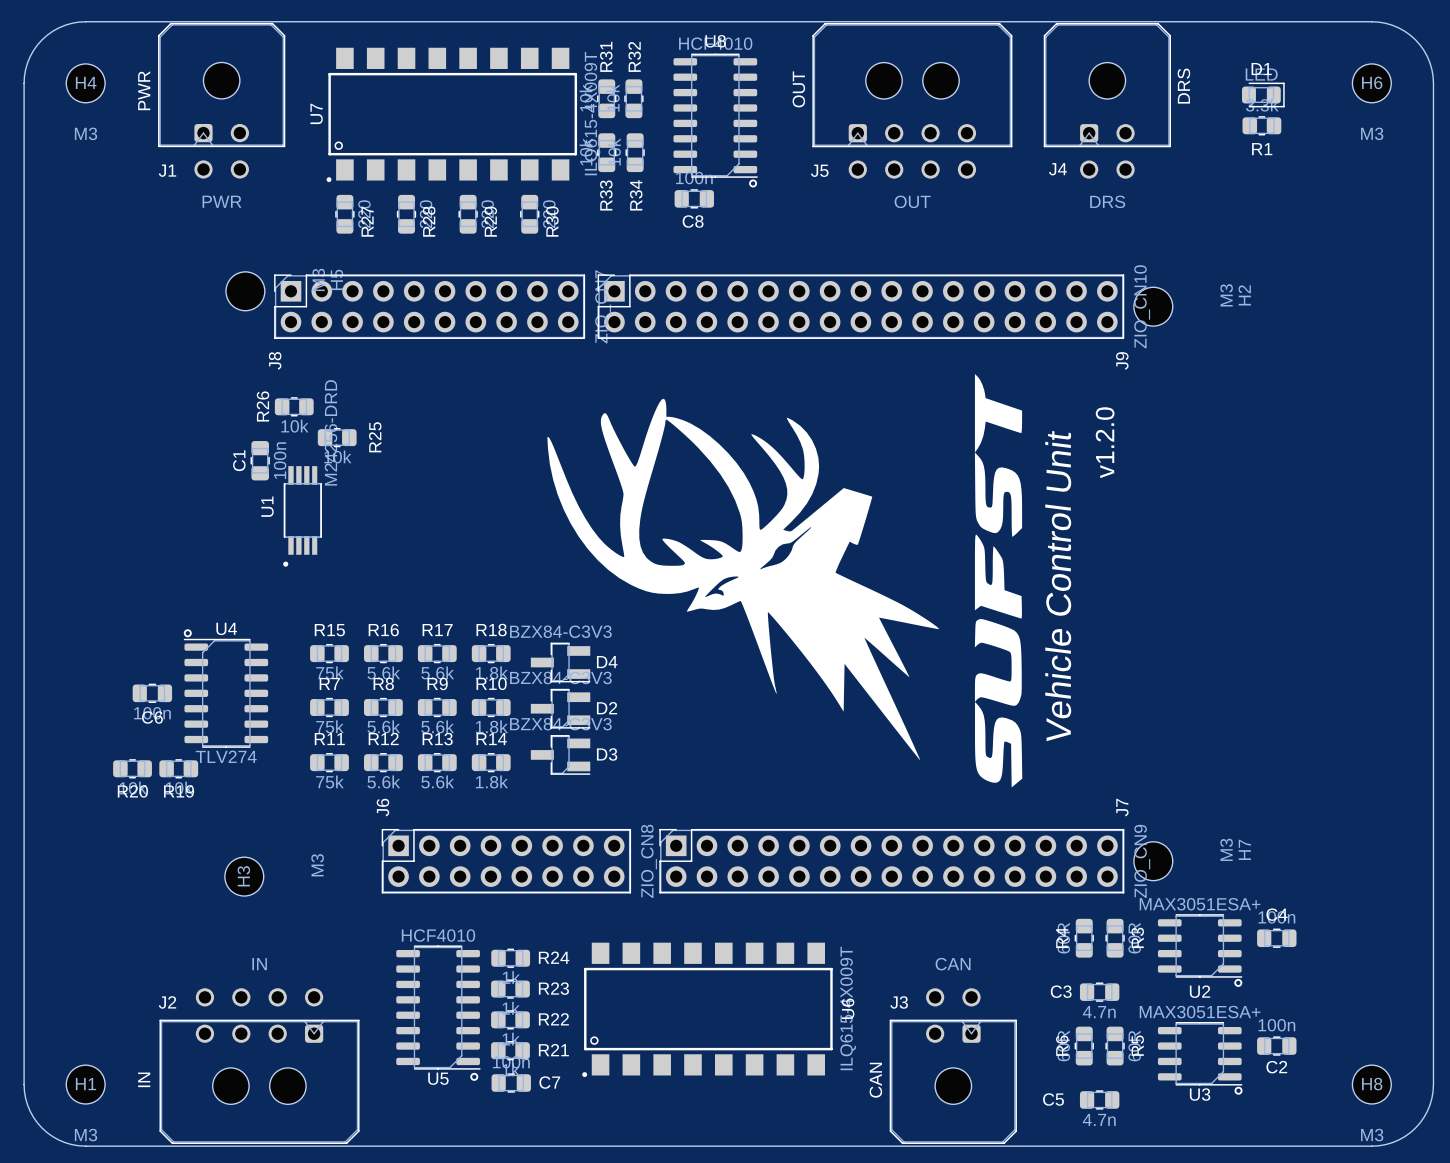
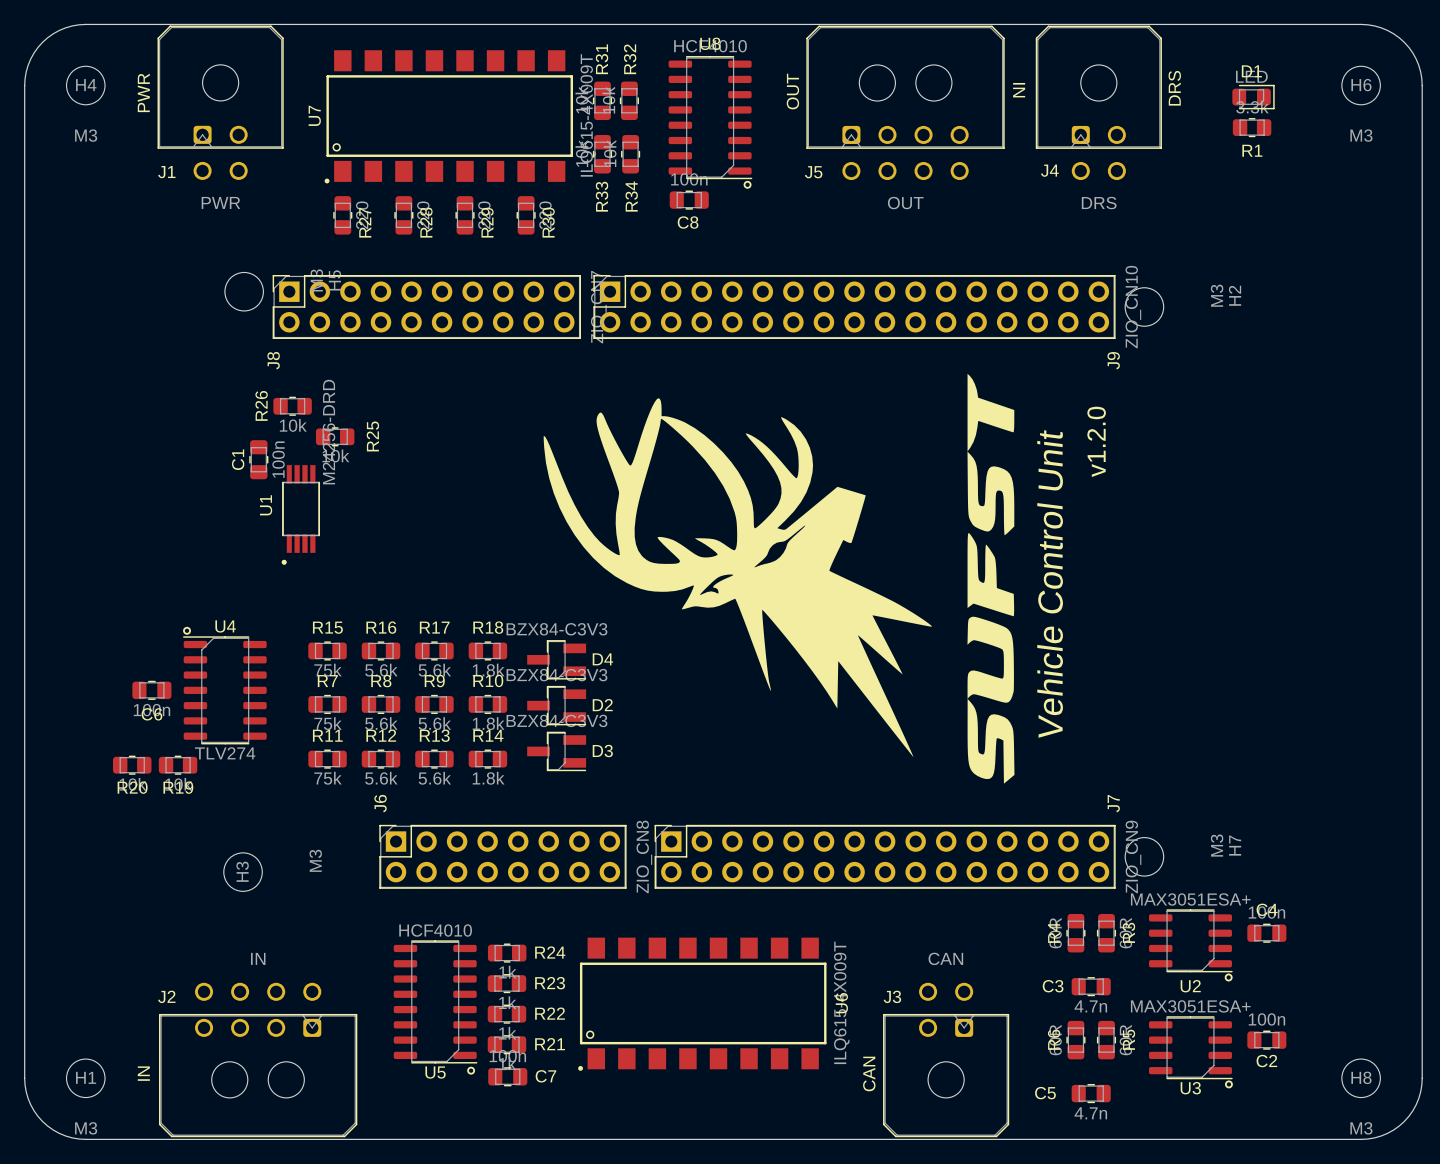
text: none -> IN (1019, 90)

